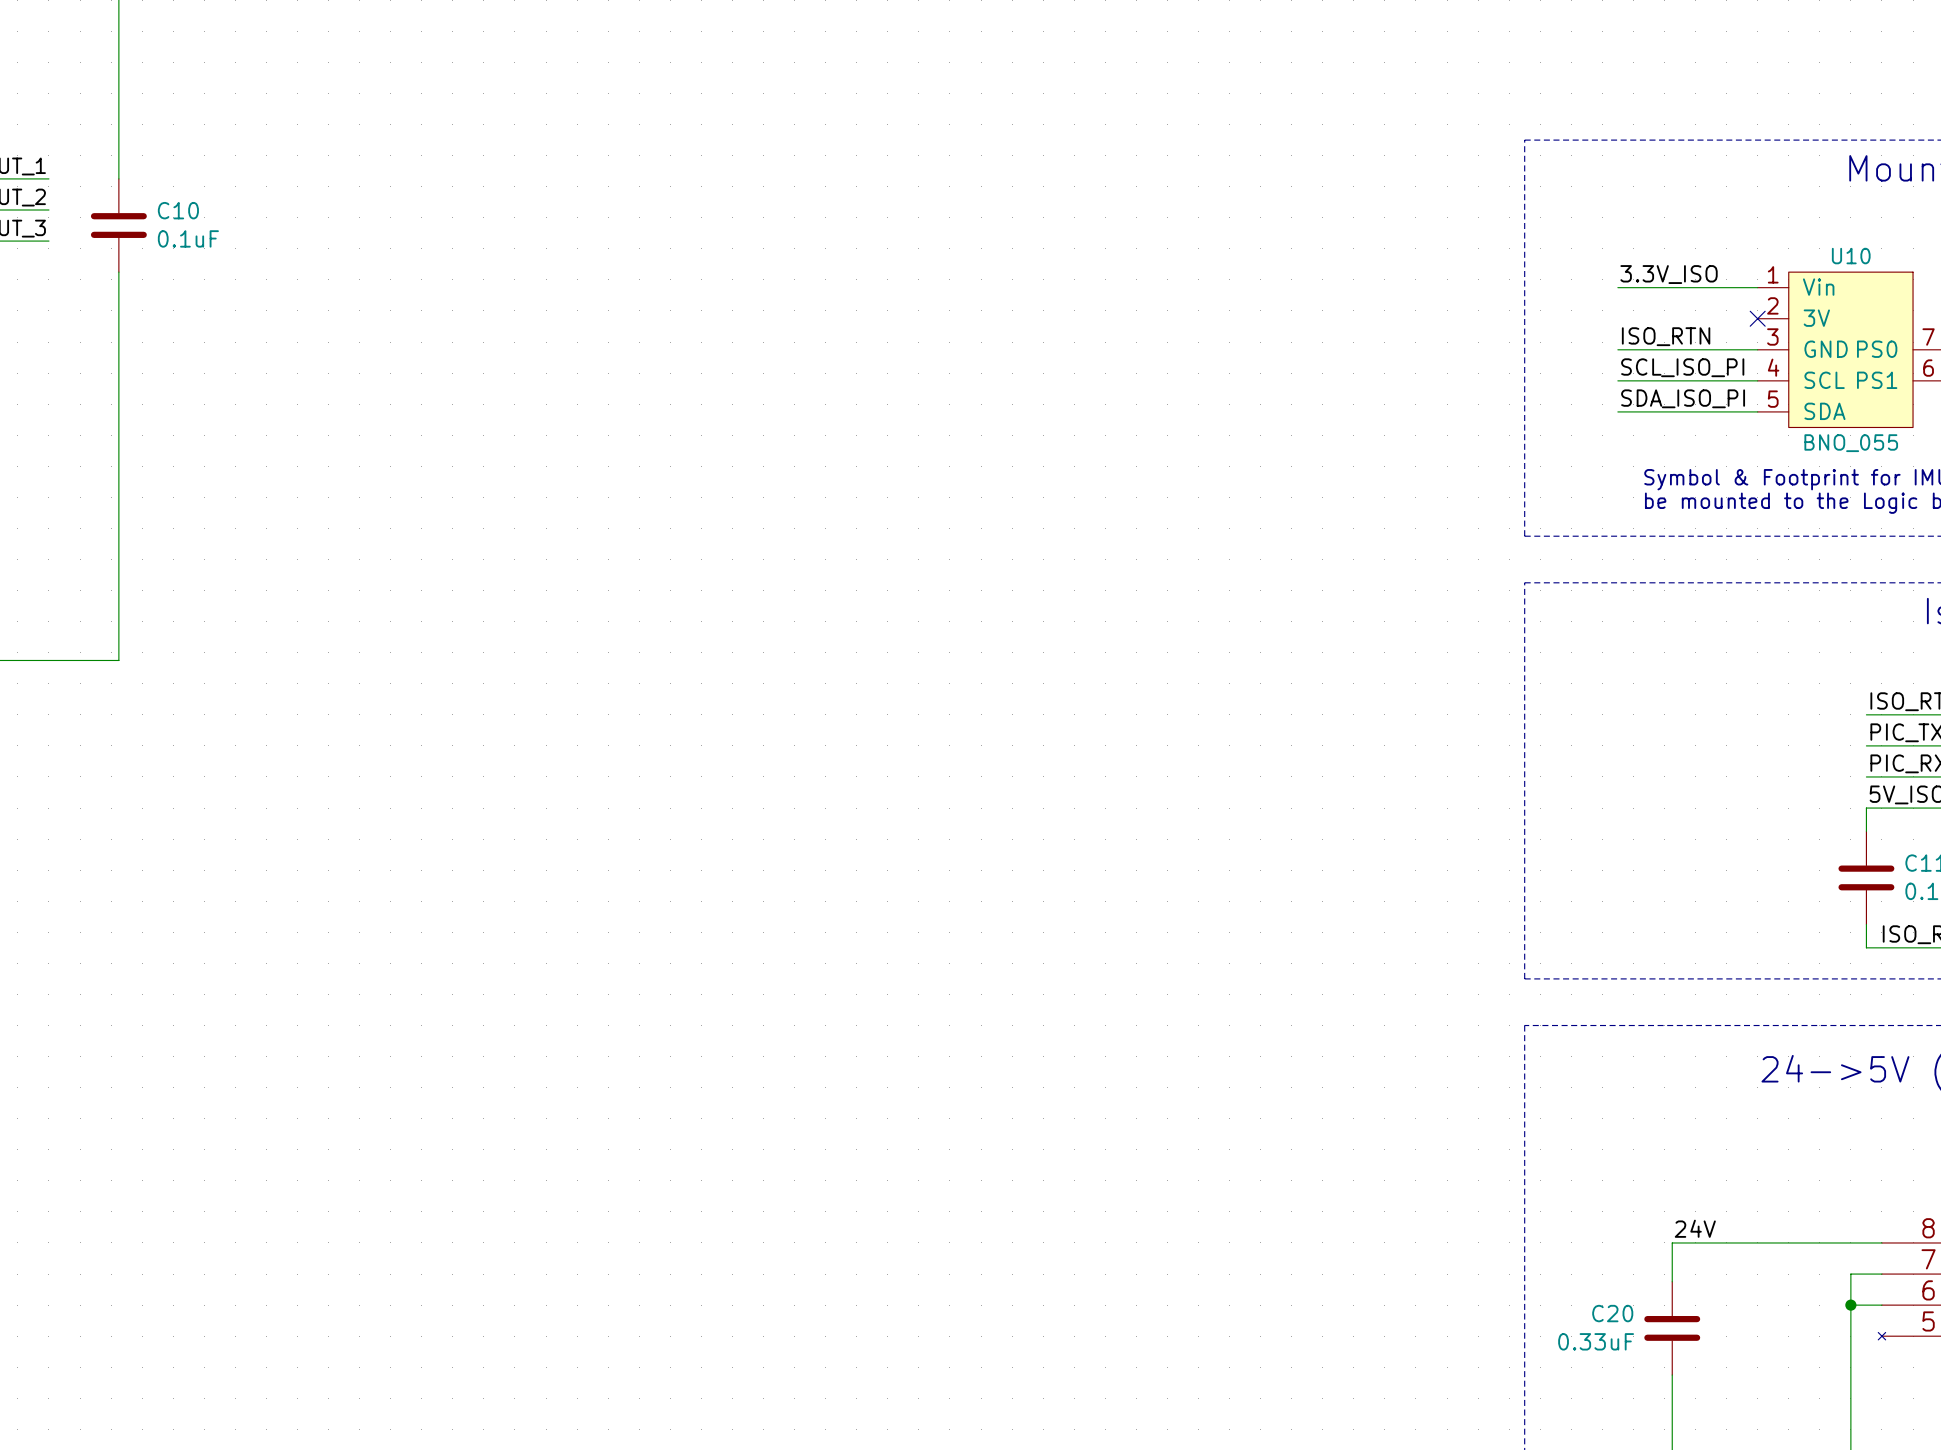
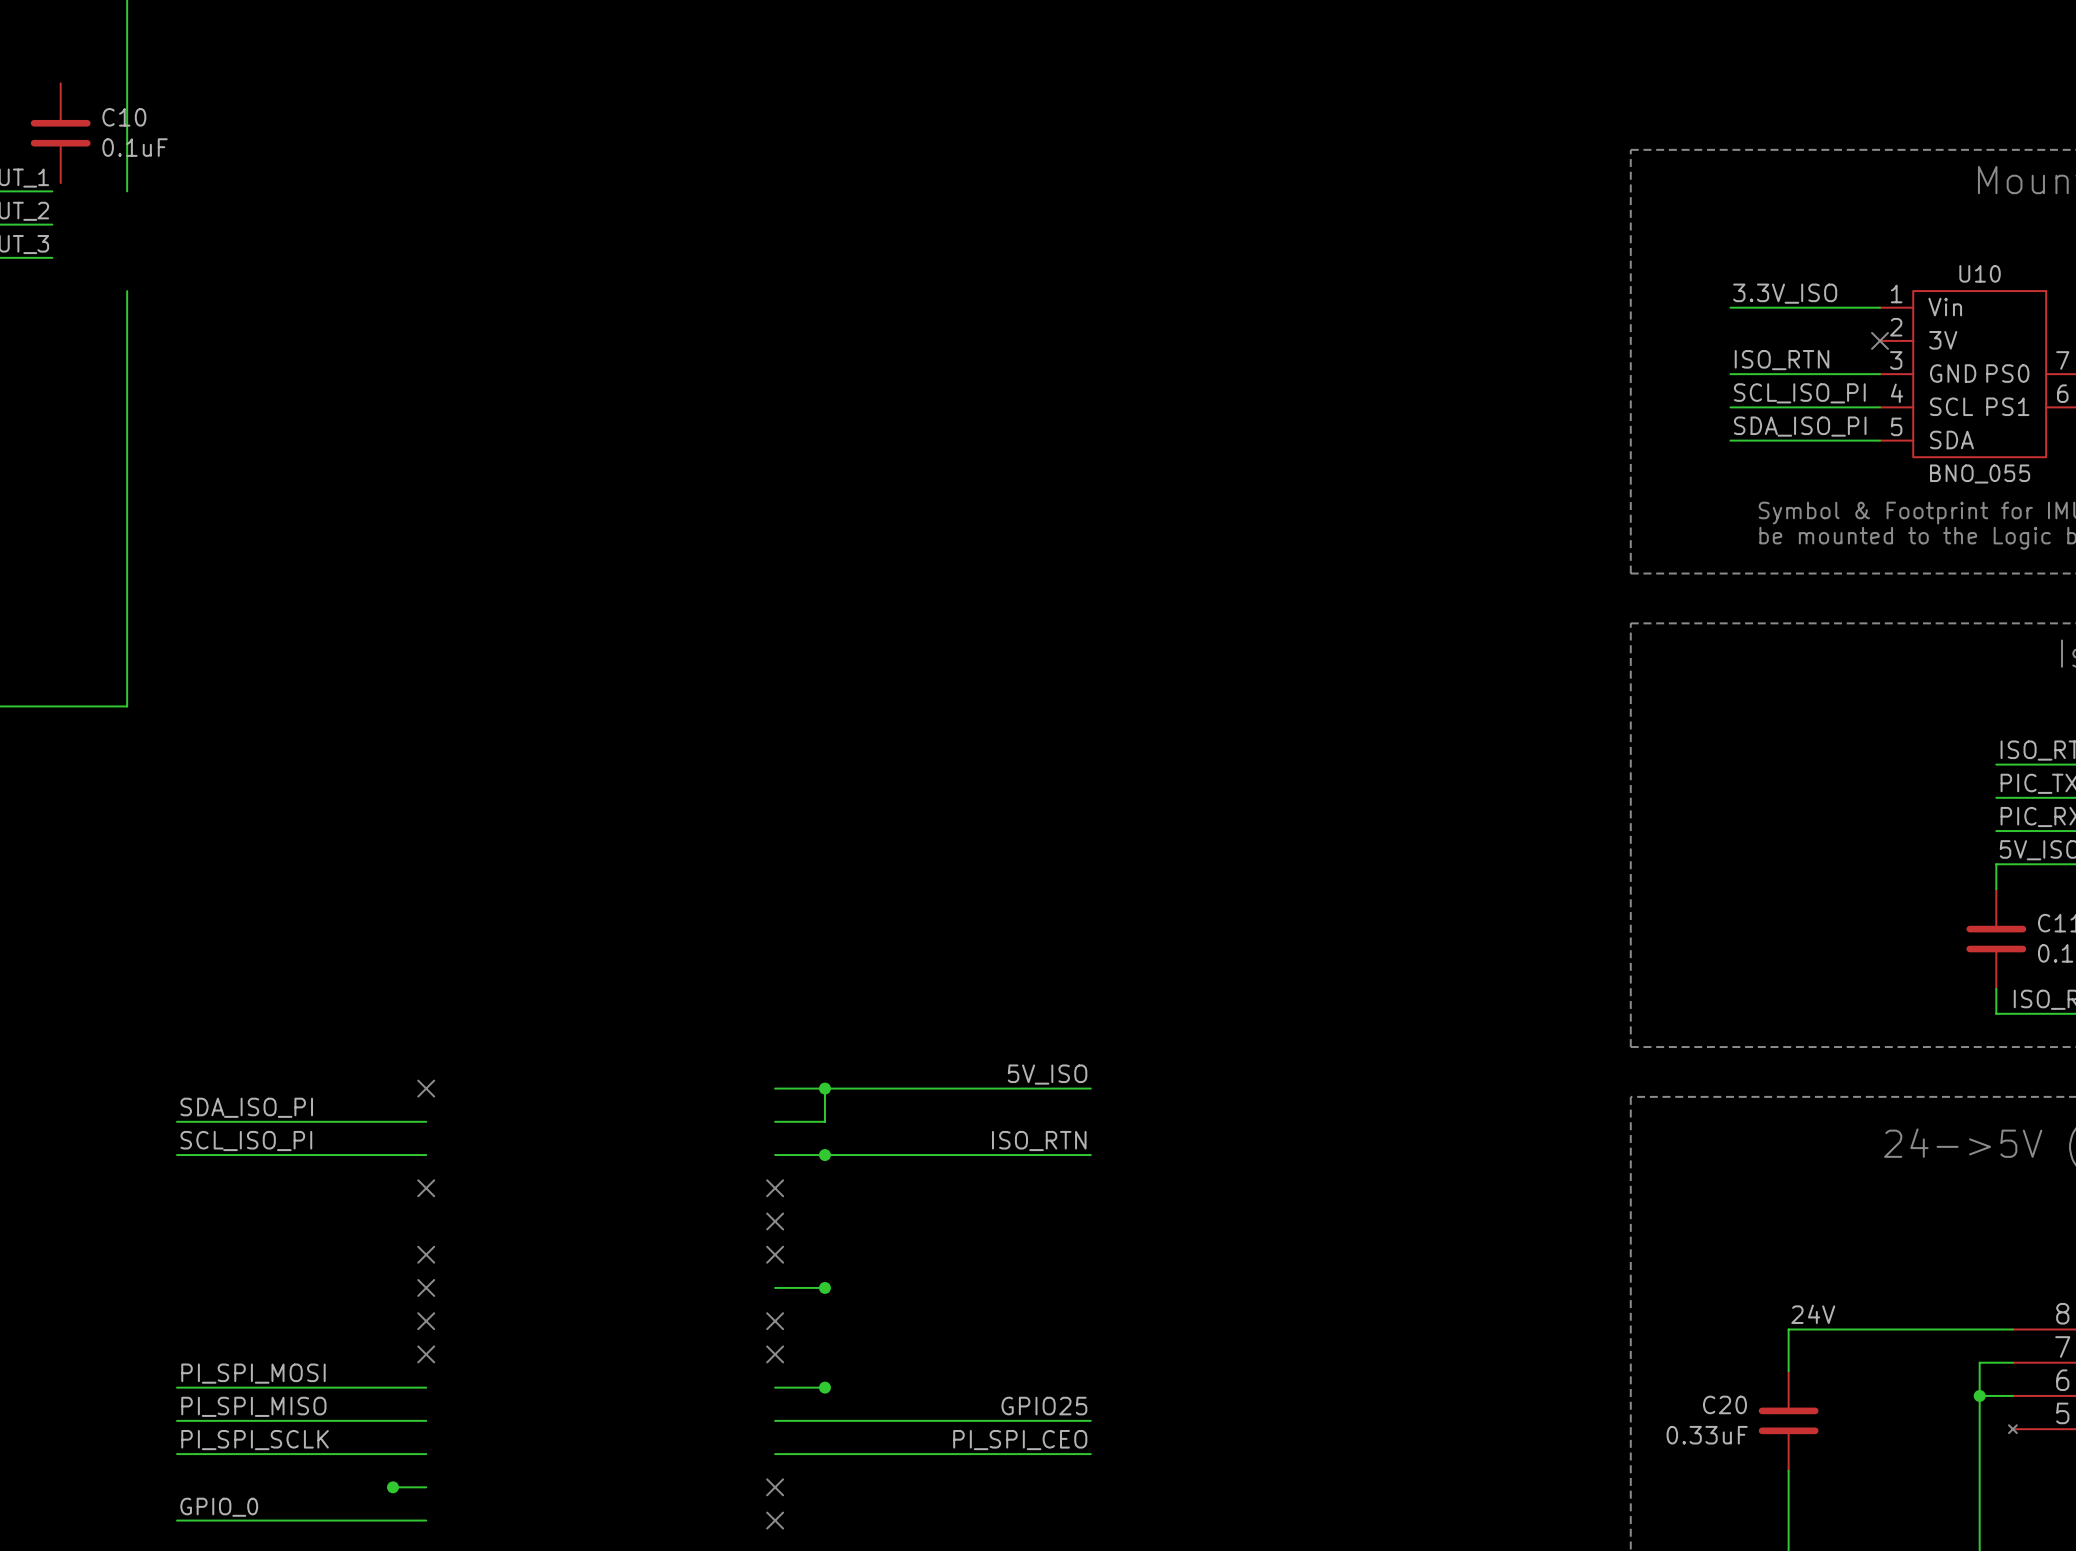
C10 position: (118, 225) -> (60, 133)
label: none -> 5V_ISO (1047, 1074)
no-connect mark: none -> (426, 1088)
wire: none -> (775, 1088) (1090, 1088)
wire: none -> (824, 1088) (824, 1121) (775, 1121)
junction: none -> (824, 1088)
label: none -> SDA_ISO_PI (246, 1107)
wire: none -> (177, 1121) (426, 1121)
label: none -> SCL_ISO_PI (246, 1141)
label: none -> ISO_RTN (1039, 1141)
wire: none -> (177, 1155) (426, 1155)
wire: none -> (775, 1155) (1090, 1155)
junction: none -> (824, 1155)
no-connect mark: none -> (426, 1188)
no-connect mark: none -> (775, 1188)
no-connect mark: none -> (775, 1221)
no-connect mark: none -> (426, 1254)
no-connect mark: none -> (775, 1254)
no-connect mark: none -> (426, 1287)
wire: none -> (775, 1287) (824, 1287)
junction: none -> (824, 1287)
no-connect mark: none -> (426, 1321)
no-connect mark: none -> (775, 1321)
no-connect mark: none -> (426, 1354)
no-connect mark: none -> (775, 1354)
label: none -> PI_SPI_MOSI (253, 1373)
wire: none -> (177, 1387) (426, 1387)
wire: none -> (775, 1387) (824, 1387)
junction: none -> (824, 1387)
label: none -> GPIO25 (1044, 1406)
label: none -> PI_SPI_MISO (253, 1406)
wire: none -> (177, 1420) (426, 1420)
wire: none -> (775, 1420) (1090, 1420)
label: none -> PI_SPI_SCLK (255, 1440)
label: none -> PI_SPI_CEO (1020, 1440)
wire: none -> (177, 1454) (426, 1454)
wire: none -> (775, 1454) (1090, 1454)
wire: none -> (392, 1487) (426, 1487)
junction: none -> (392, 1487)
no-connect mark: none -> (775, 1487)
label: none -> GPIO_0 (219, 1507)
wire: none -> (177, 1520) (426, 1520)
no-connect mark: none -> (775, 1520)

